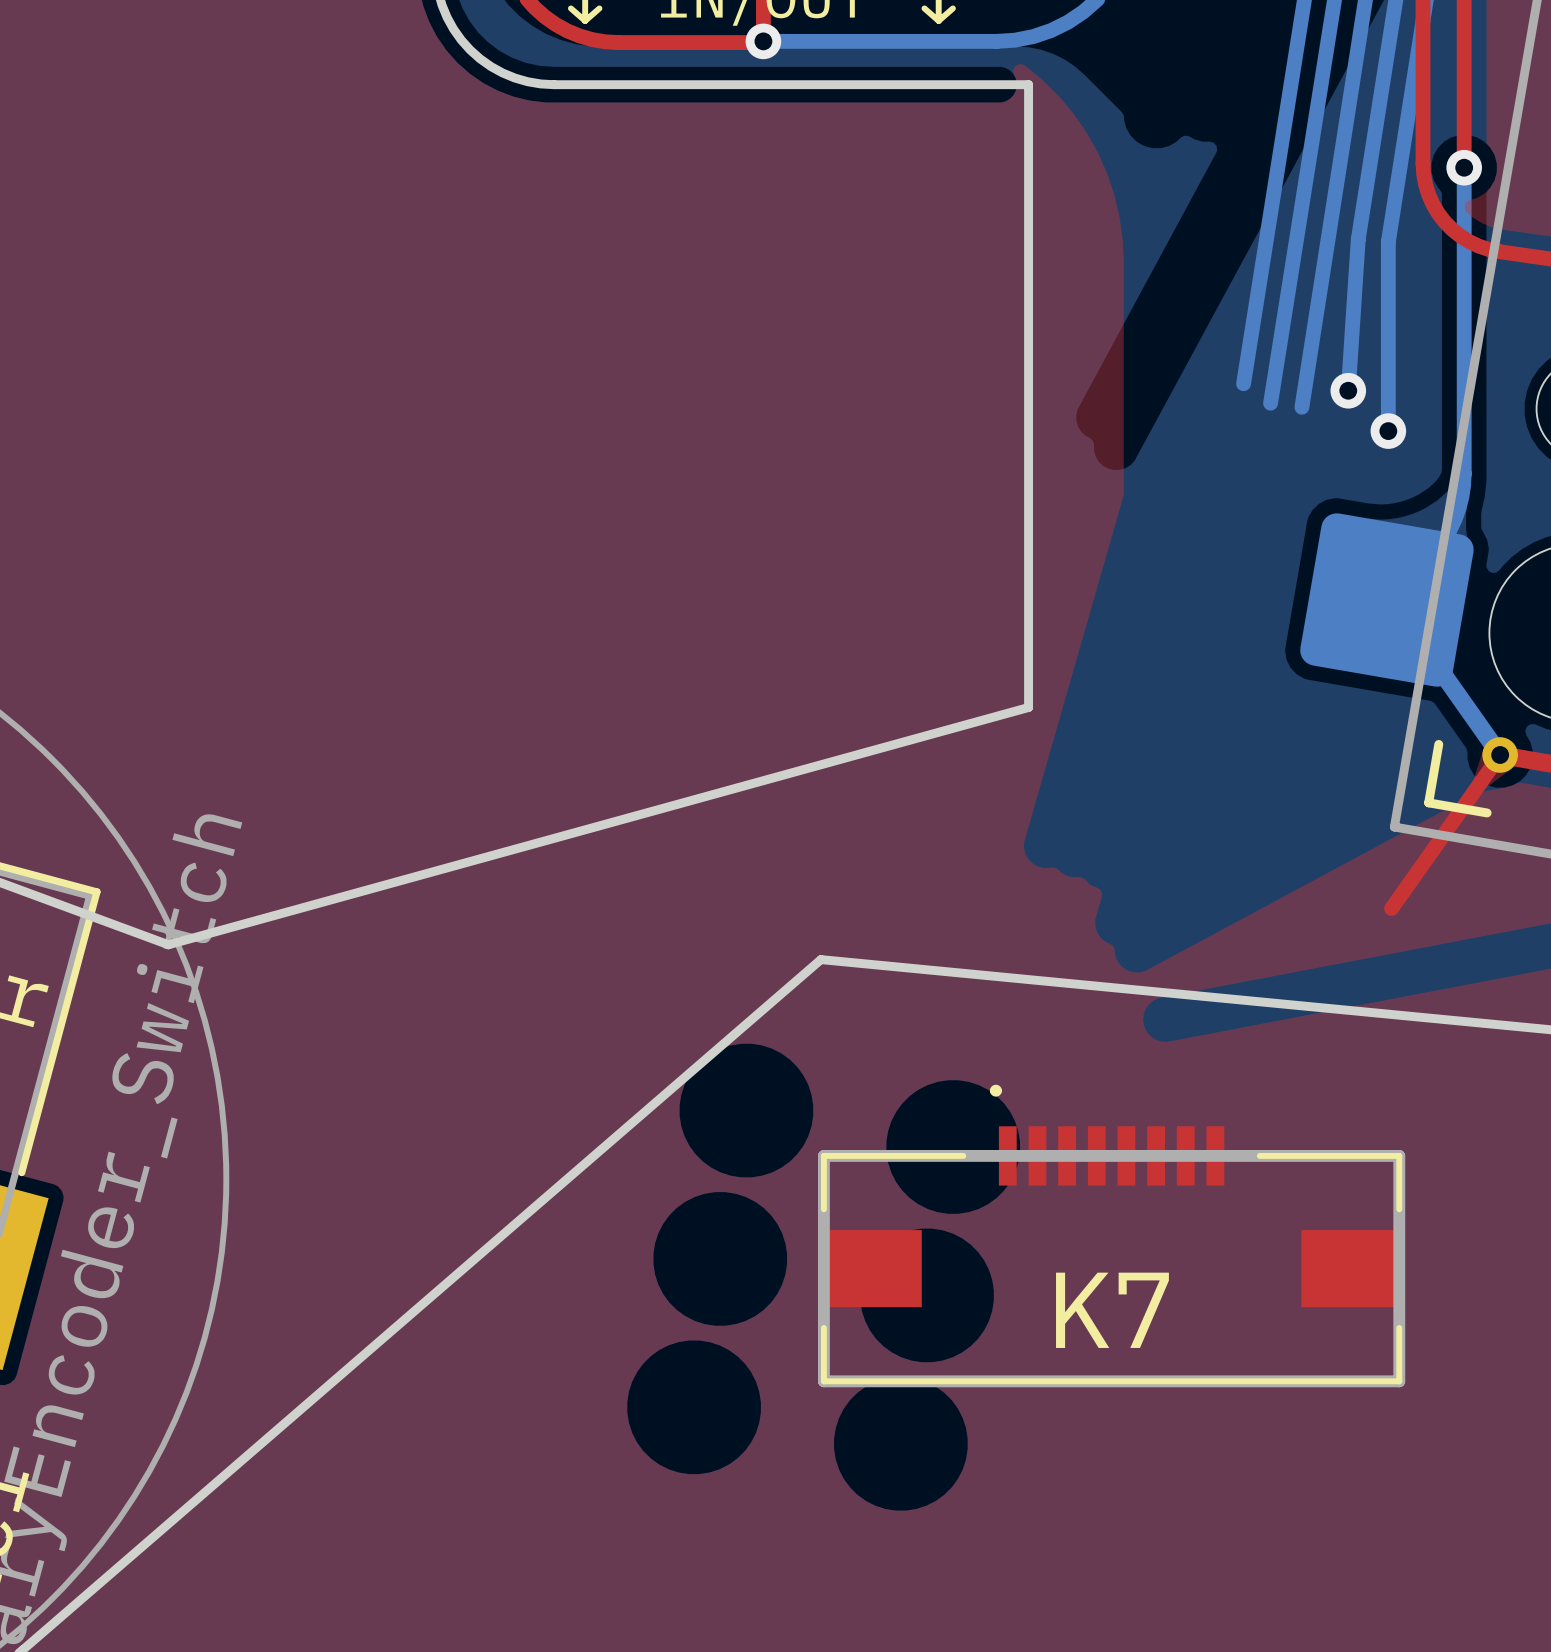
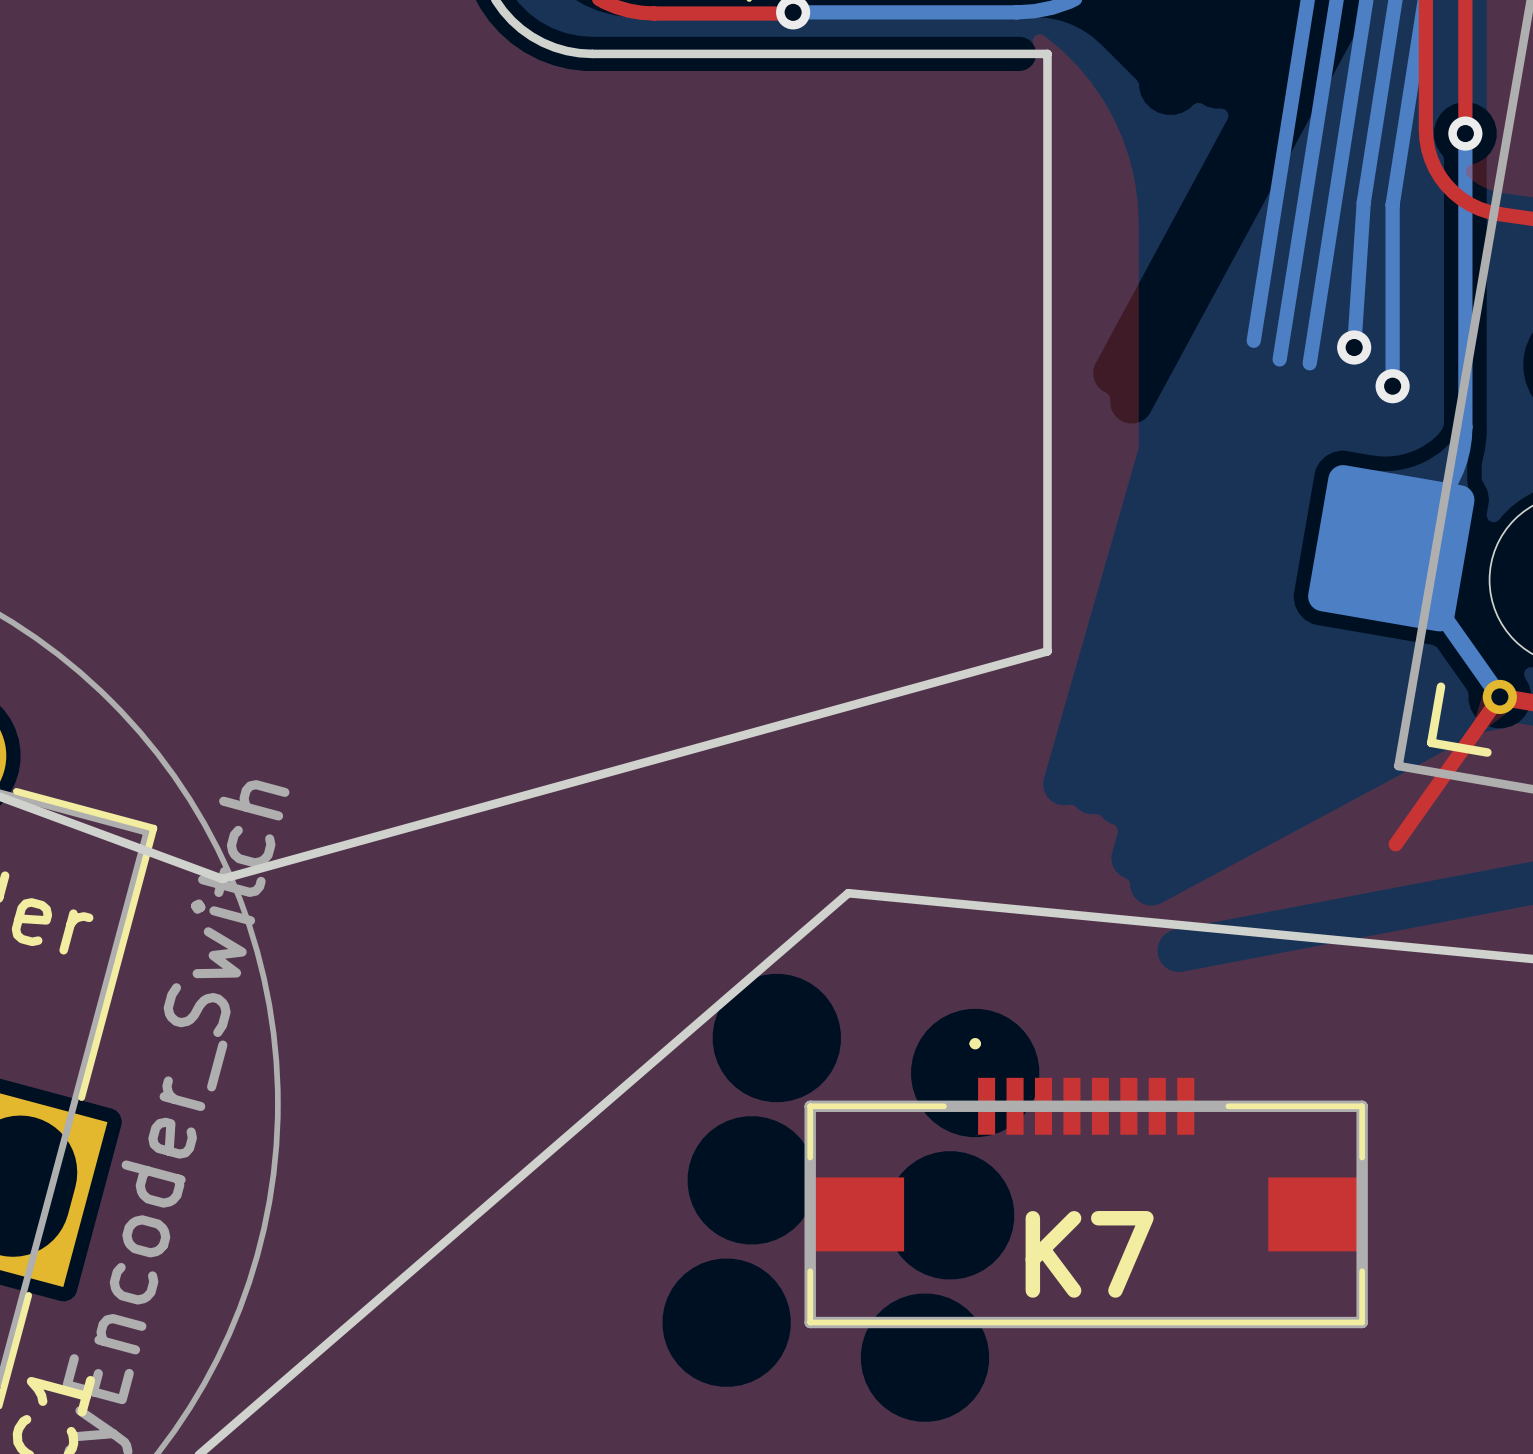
K7 position: (1111, 1236) -> (1086, 1183)

